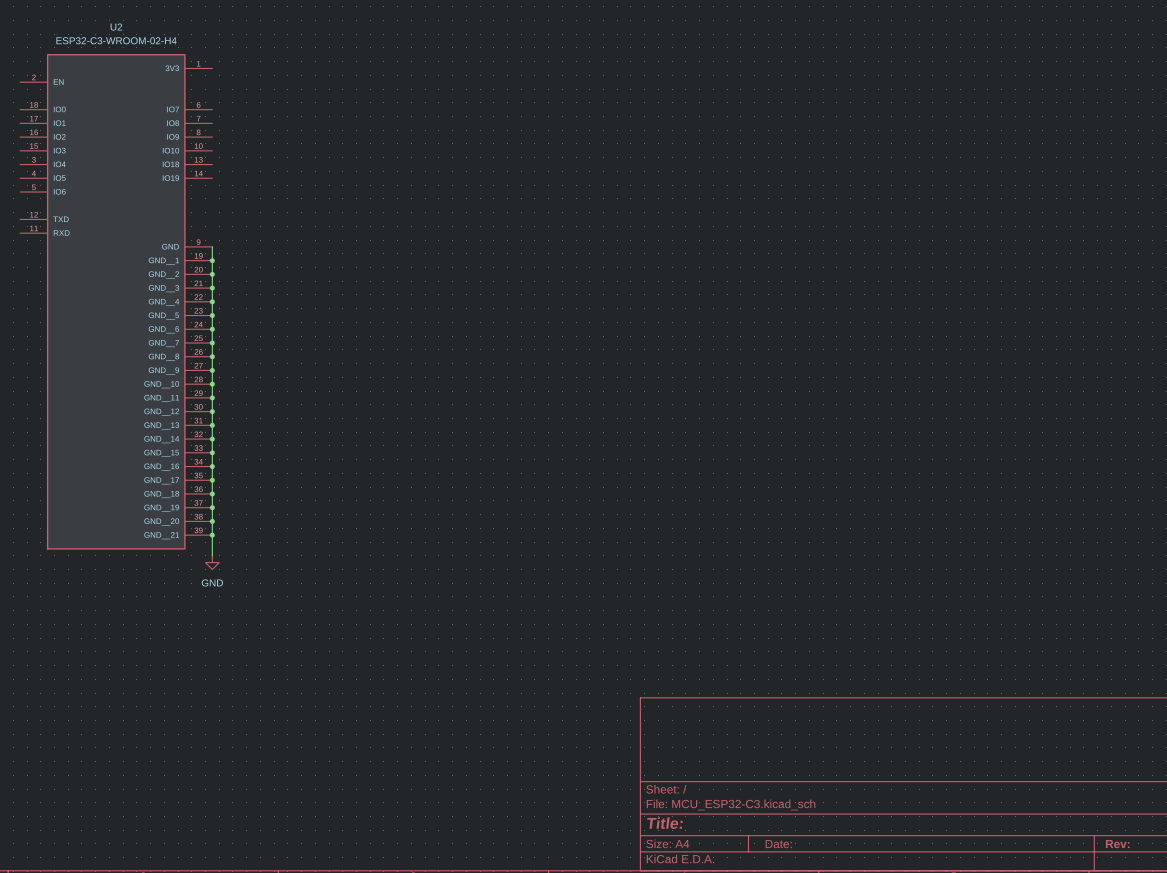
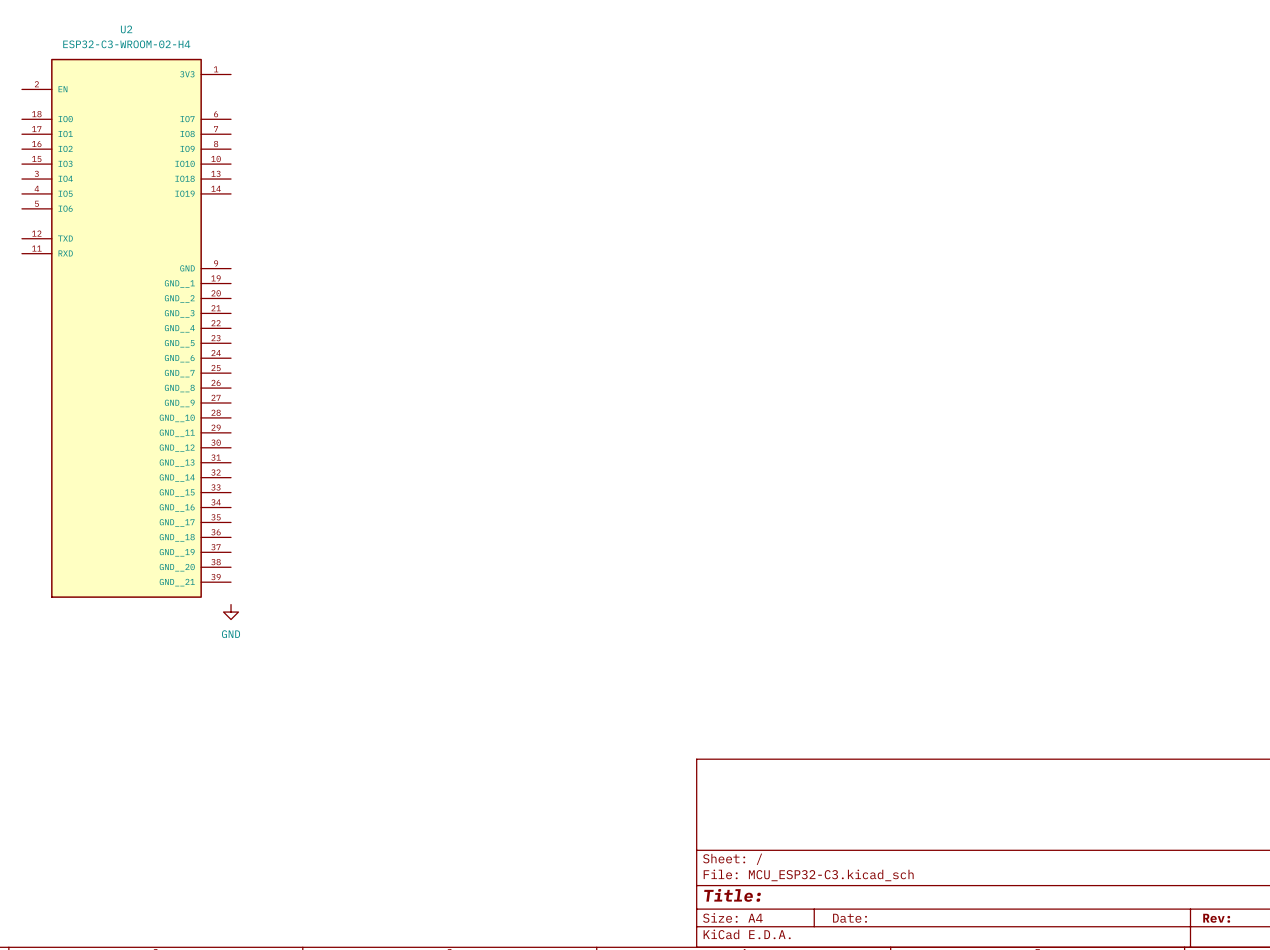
wire: (212, 246) (212, 555) -> none
junction: (212, 260) -> none
junction: (212, 274) -> none
junction: (212, 288) -> none
junction: (212, 301) -> none
junction: (212, 315) -> none
junction: (212, 329) -> none
junction: (212, 342) -> none
junction: (212, 356) -> none
junction: (212, 370) -> none
junction: (212, 384) -> none
junction: (212, 397) -> none
junction: (212, 411) -> none
junction: (212, 425) -> none
junction: (212, 439) -> none
junction: (212, 452) -> none
junction: (212, 466) -> none
junction: (212, 480) -> none
junction: (212, 493) -> none
junction: (212, 507) -> none
junction: (212, 521) -> none
junction: (212, 535) -> none

